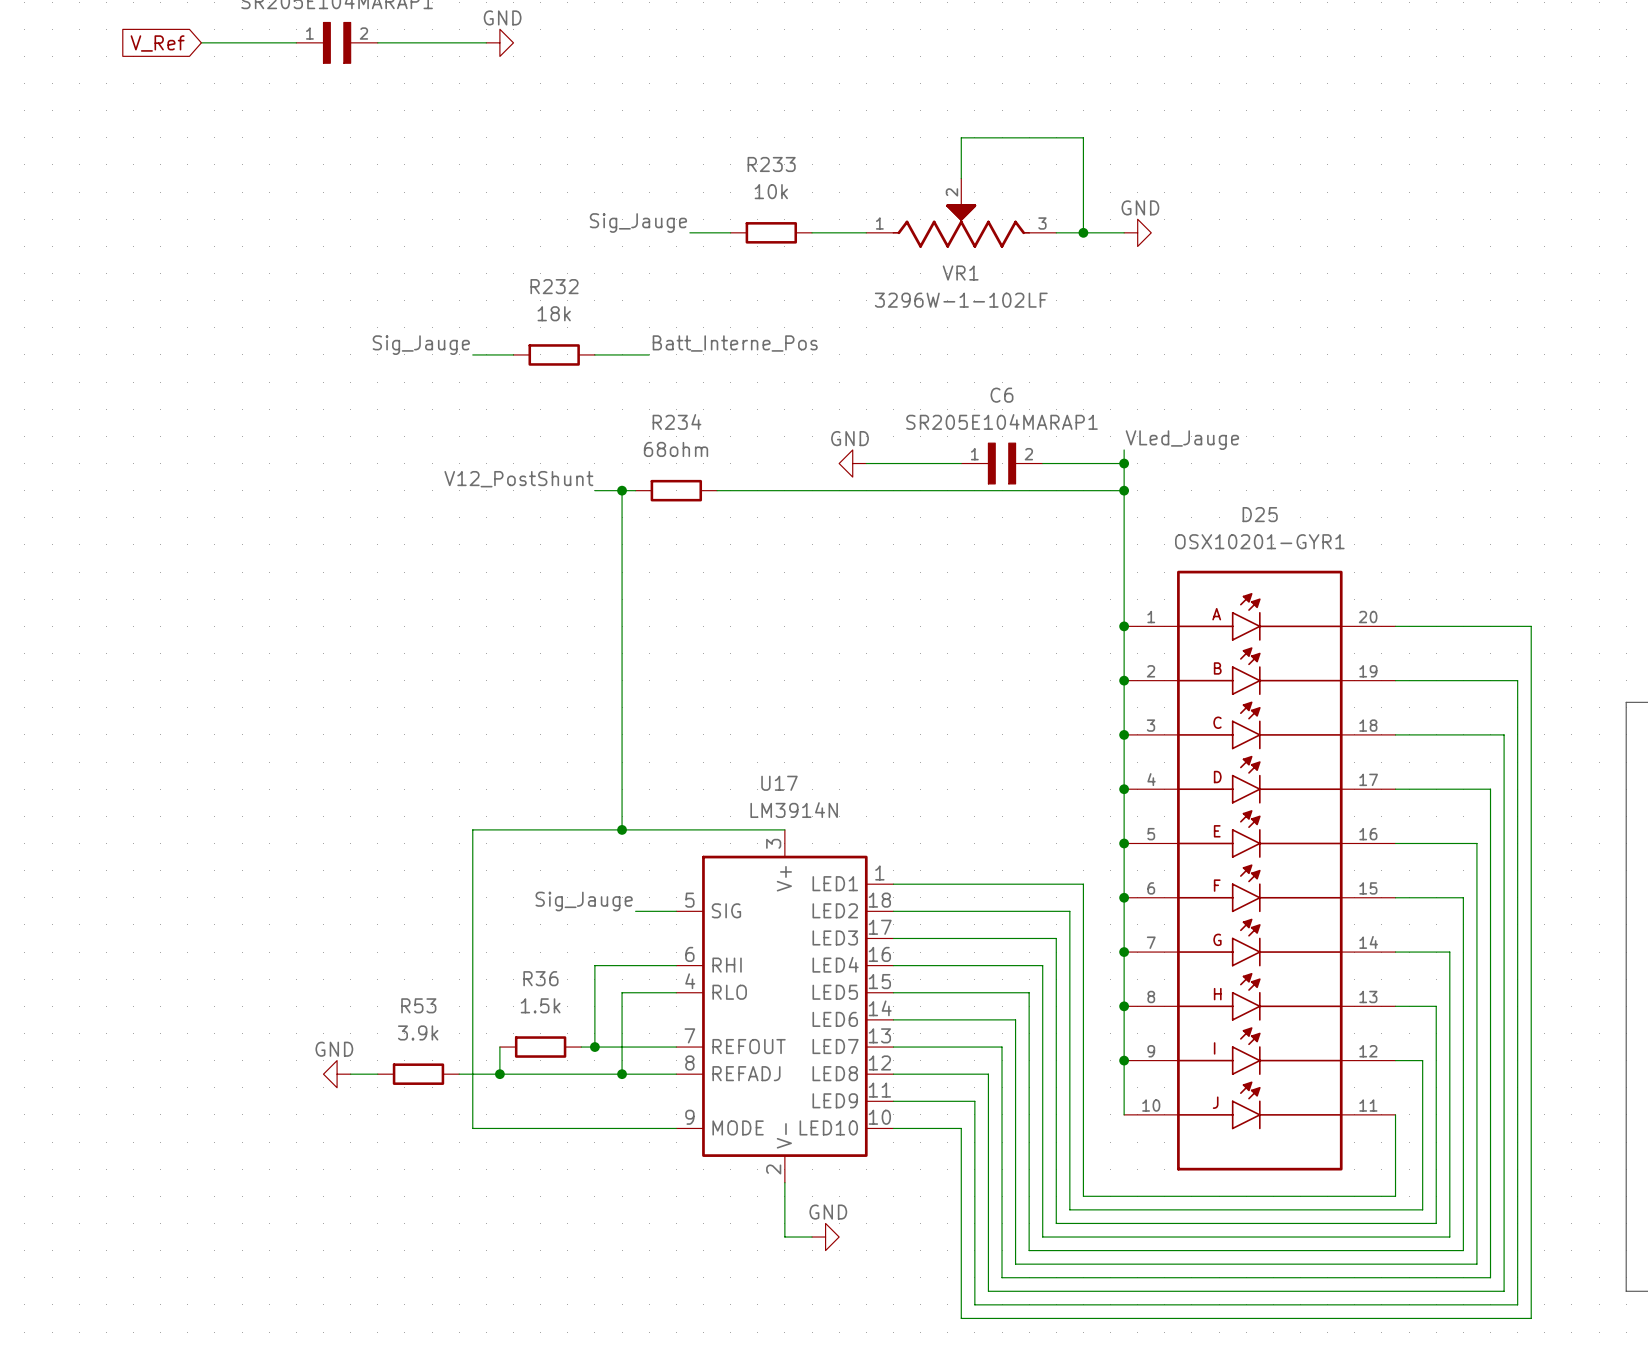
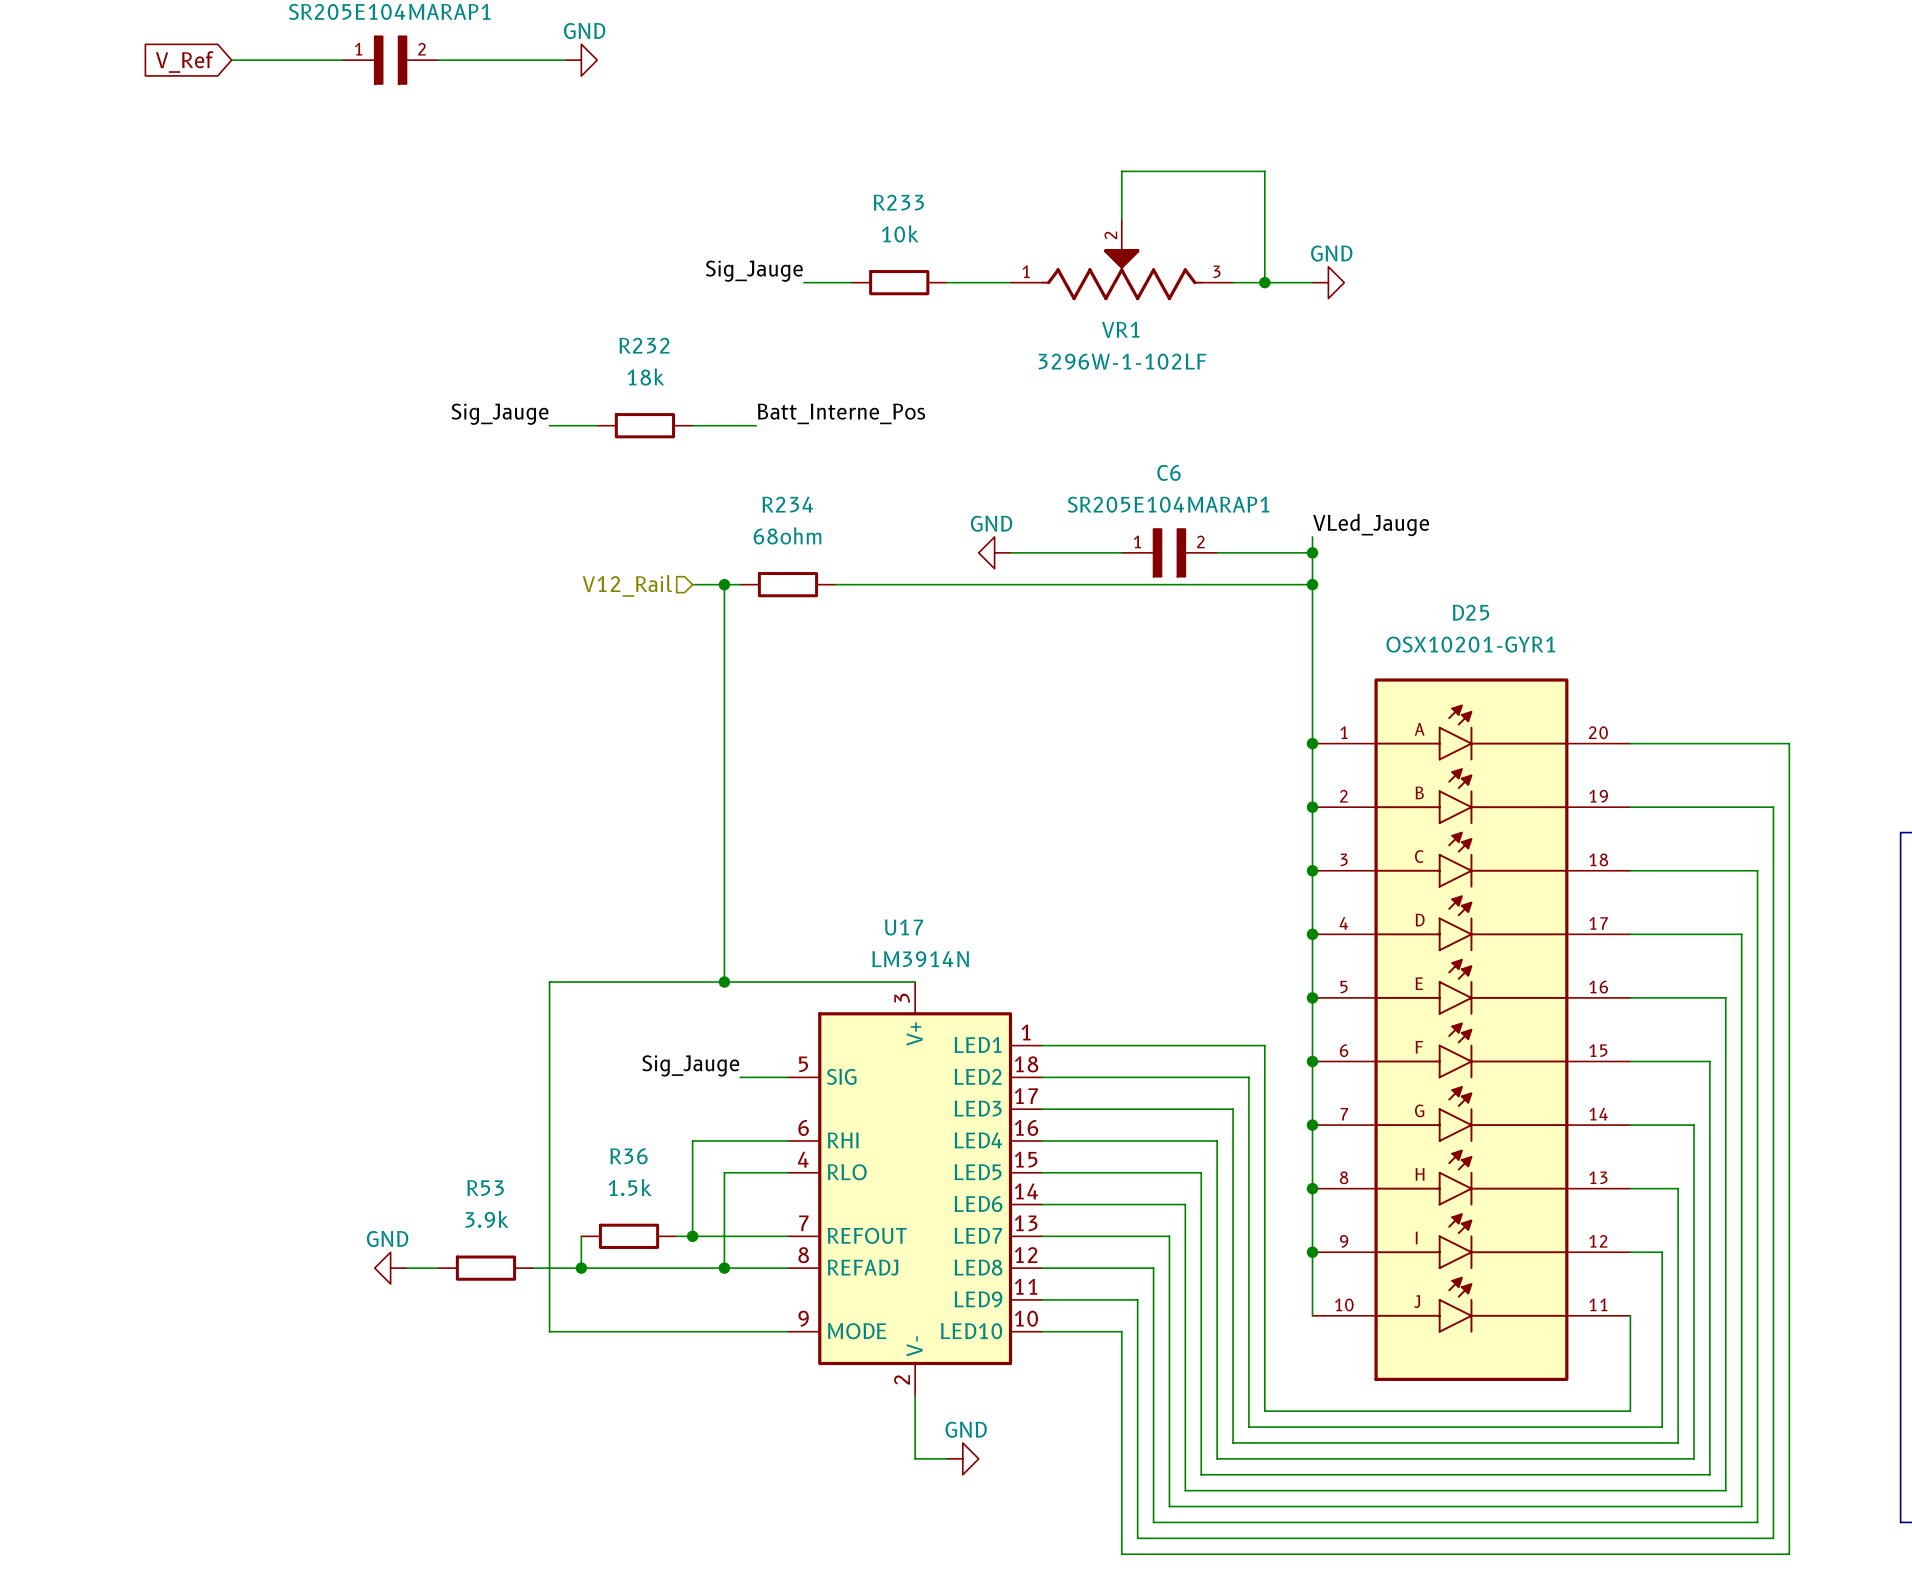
label: V12_PostShunt (518, 479) -> none
hierarchical label: none -> V12_Rail (627, 585)

